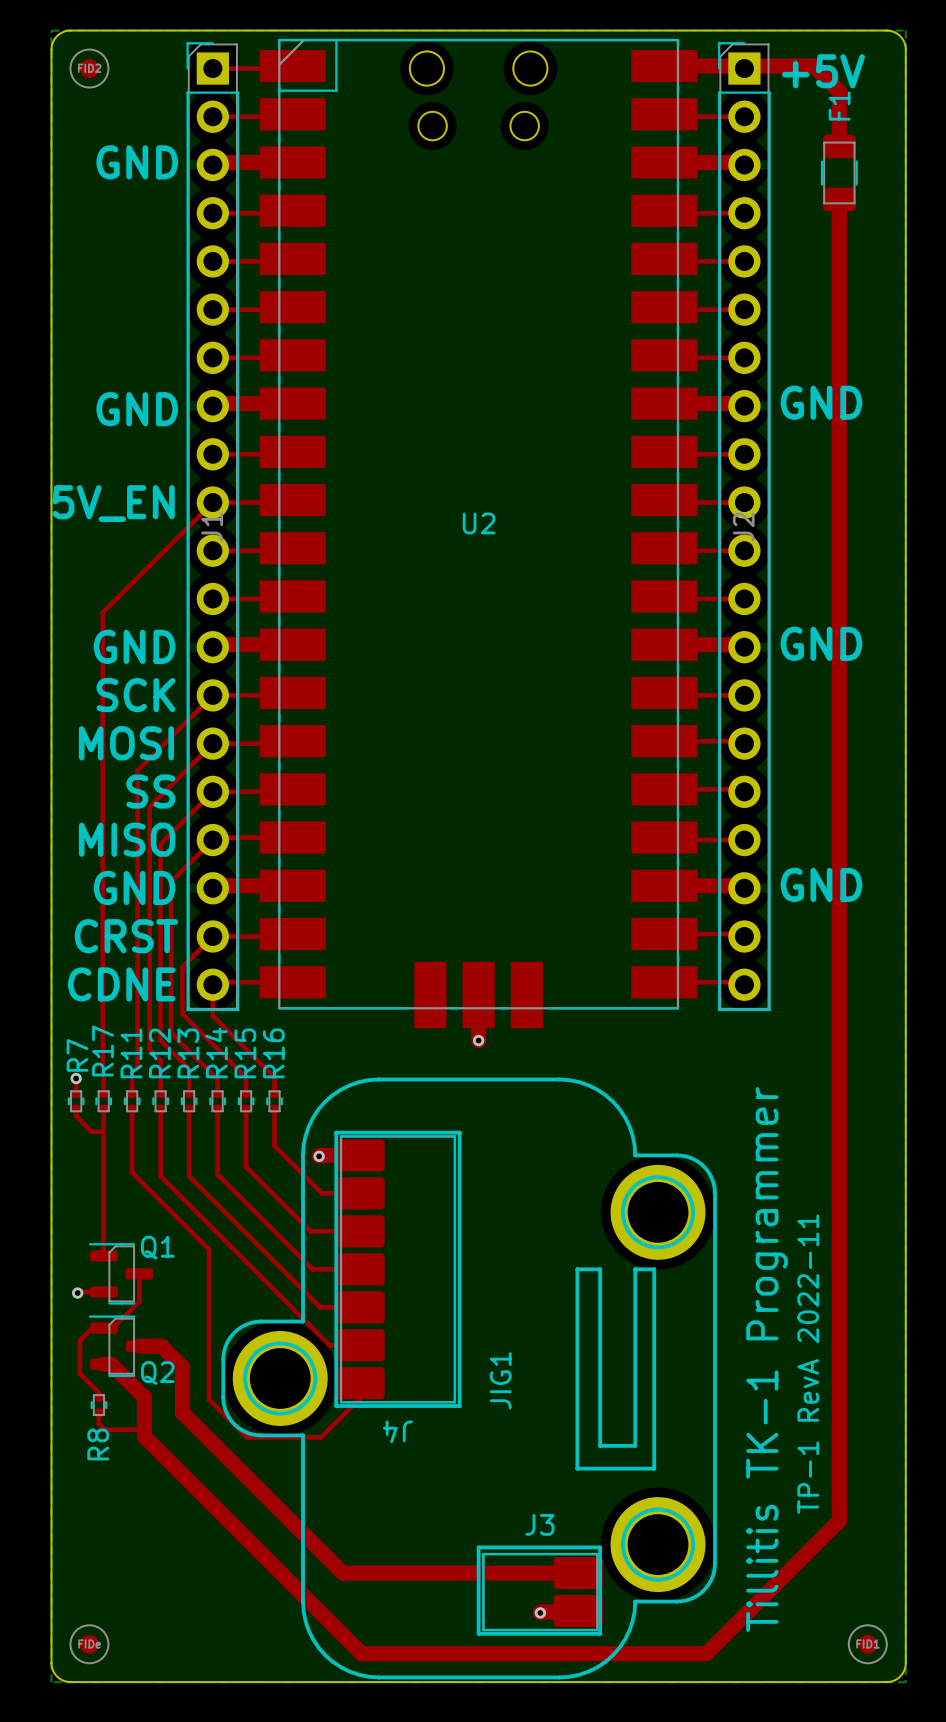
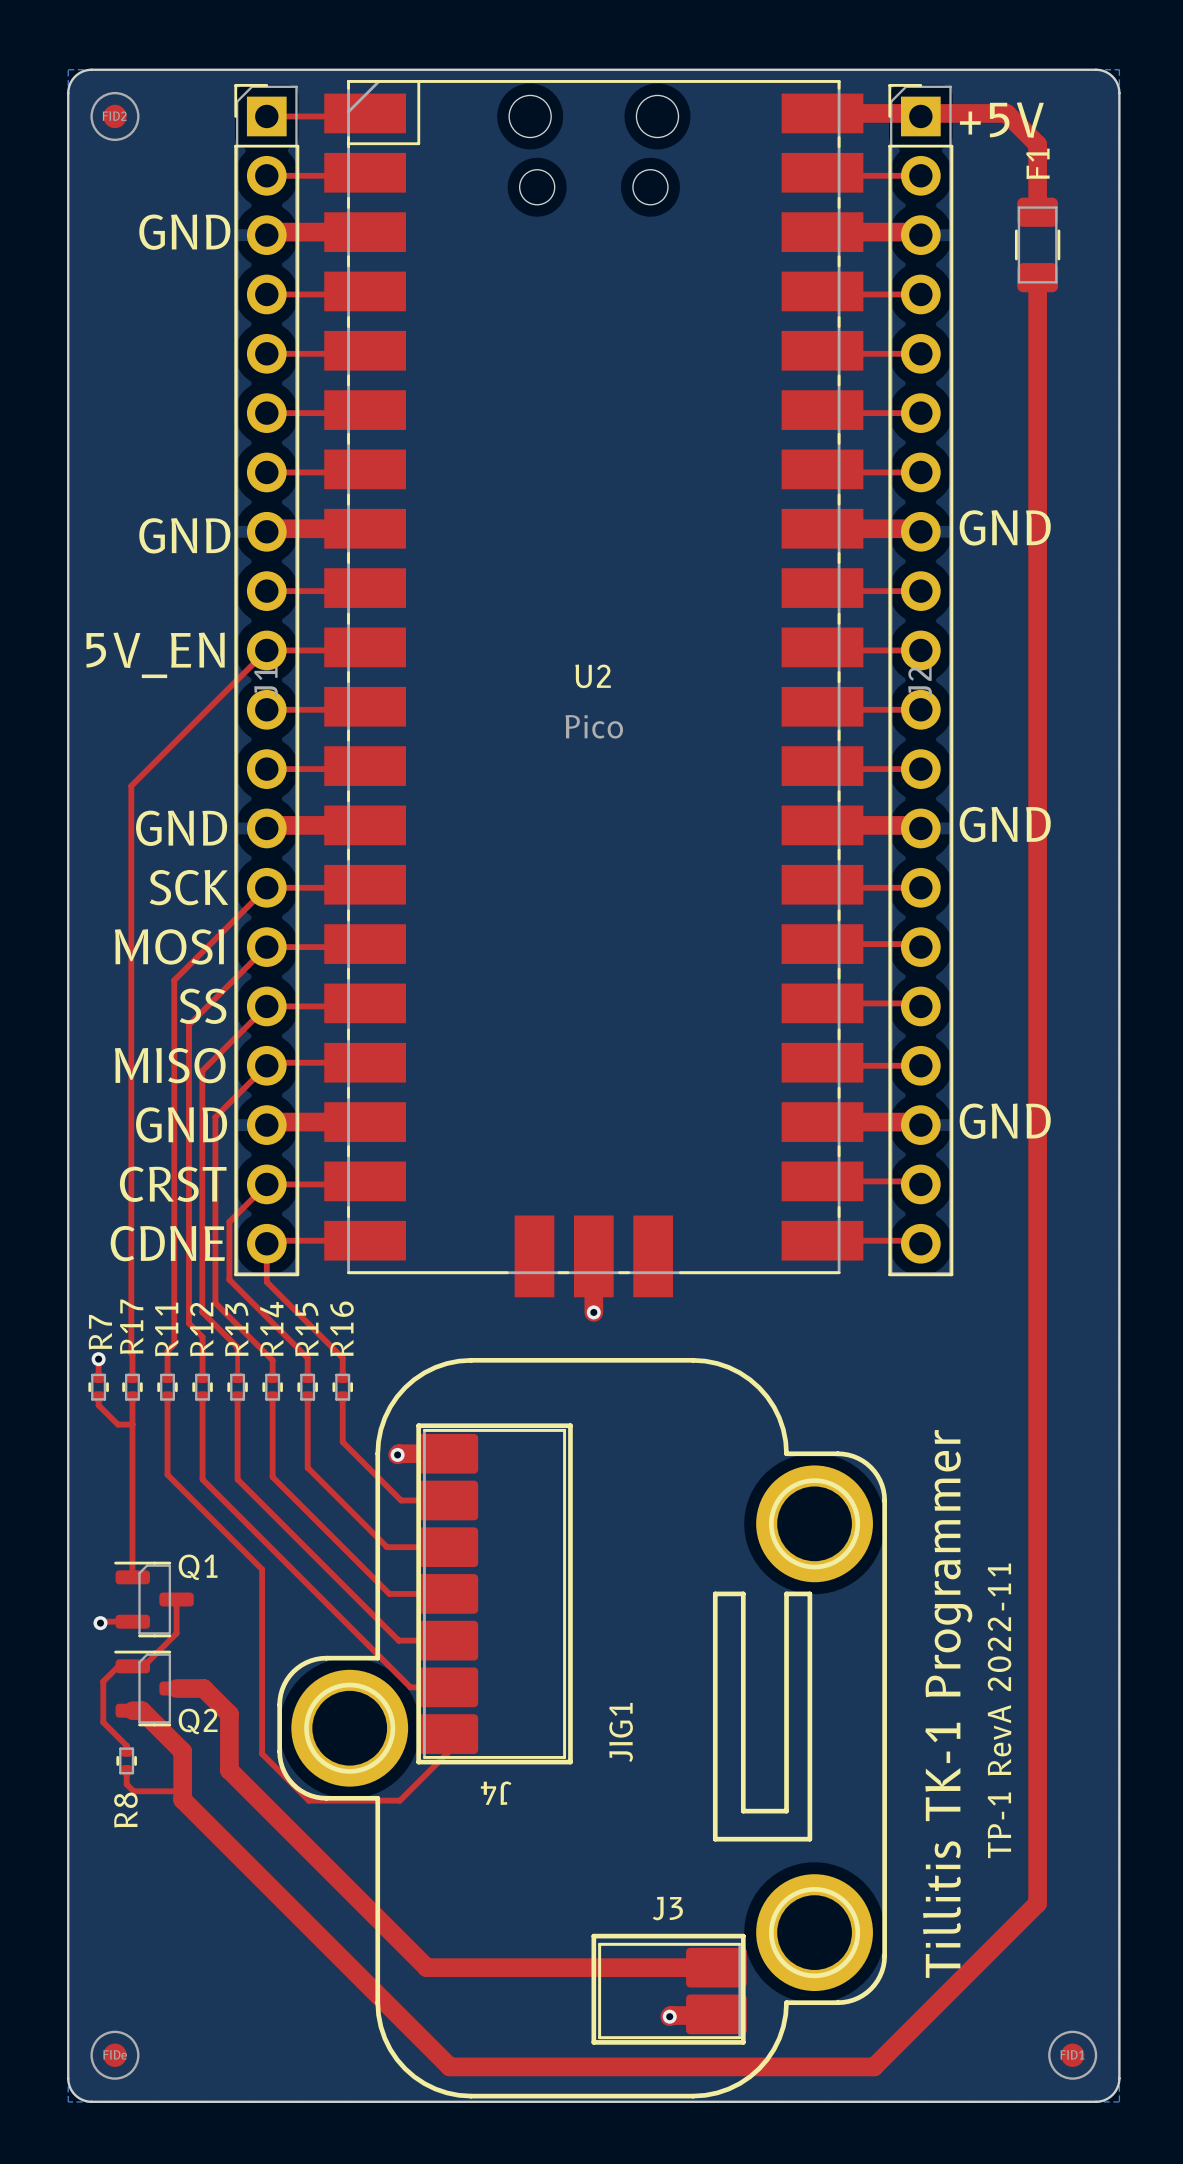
U2 value: none -> Pico (594, 726)

